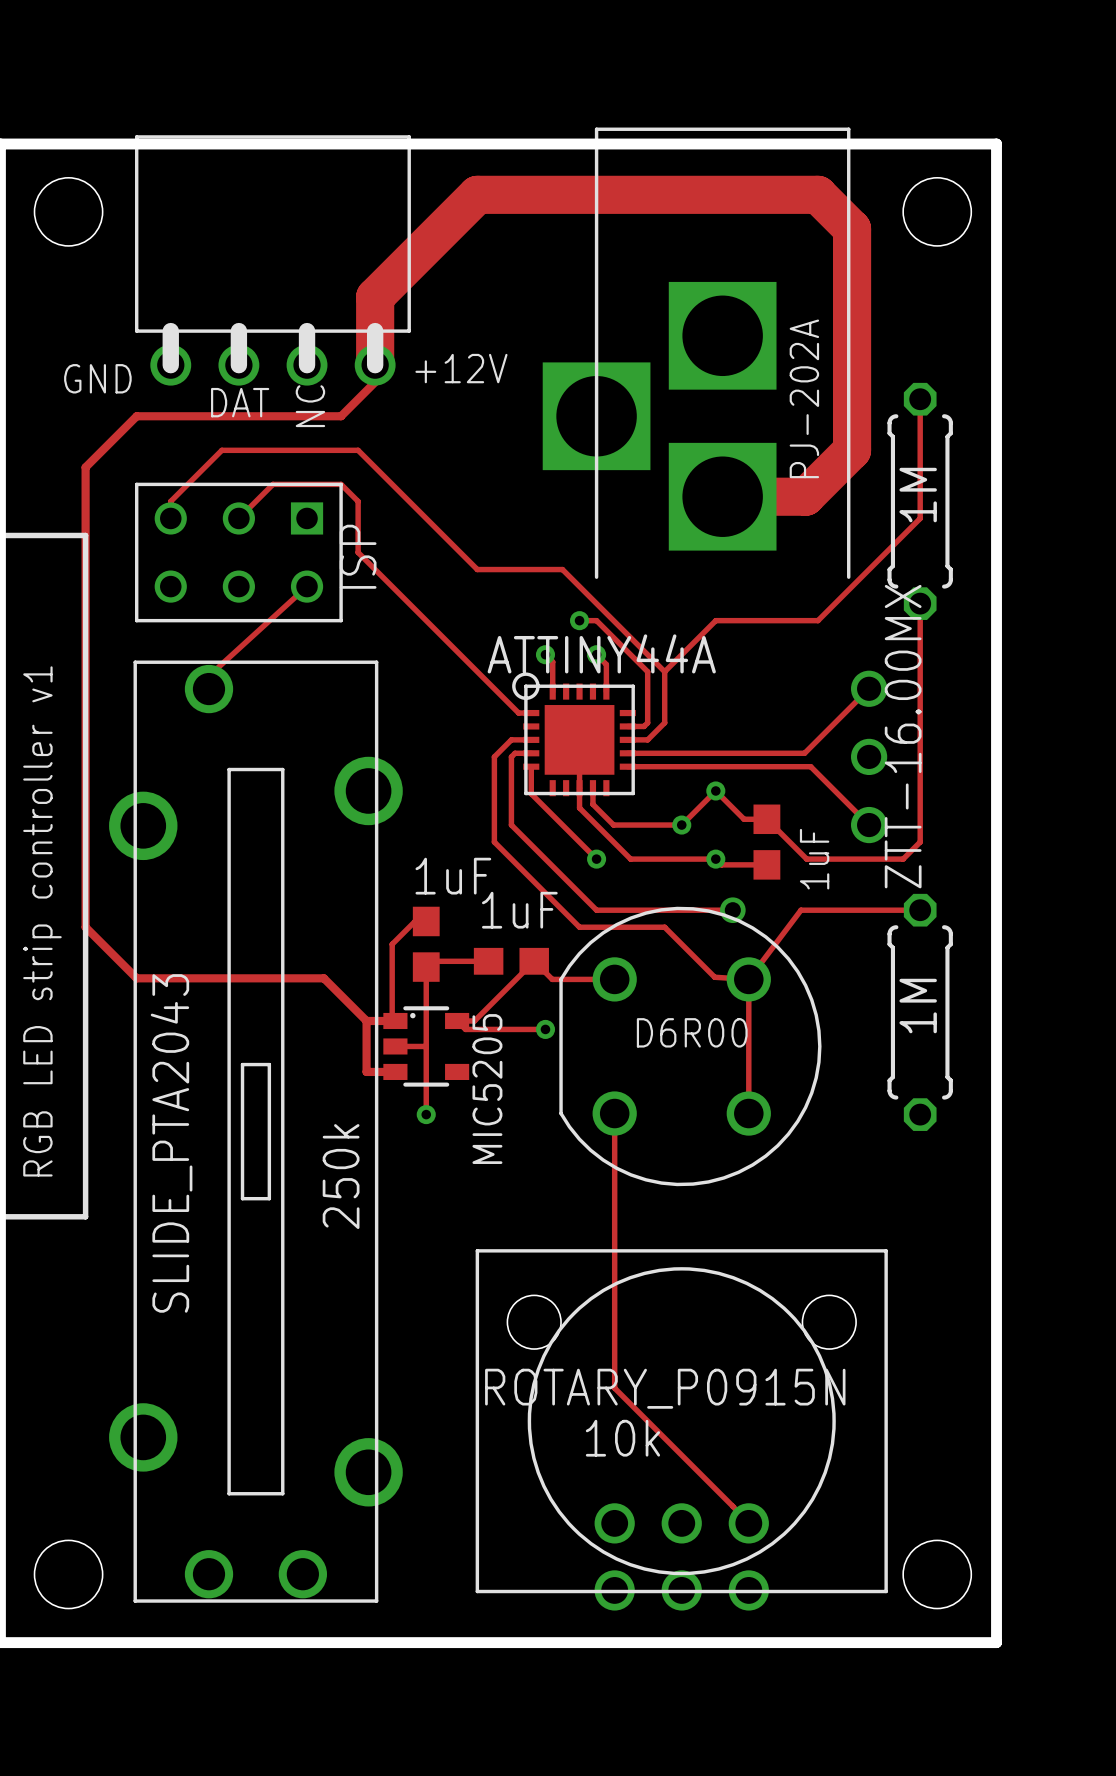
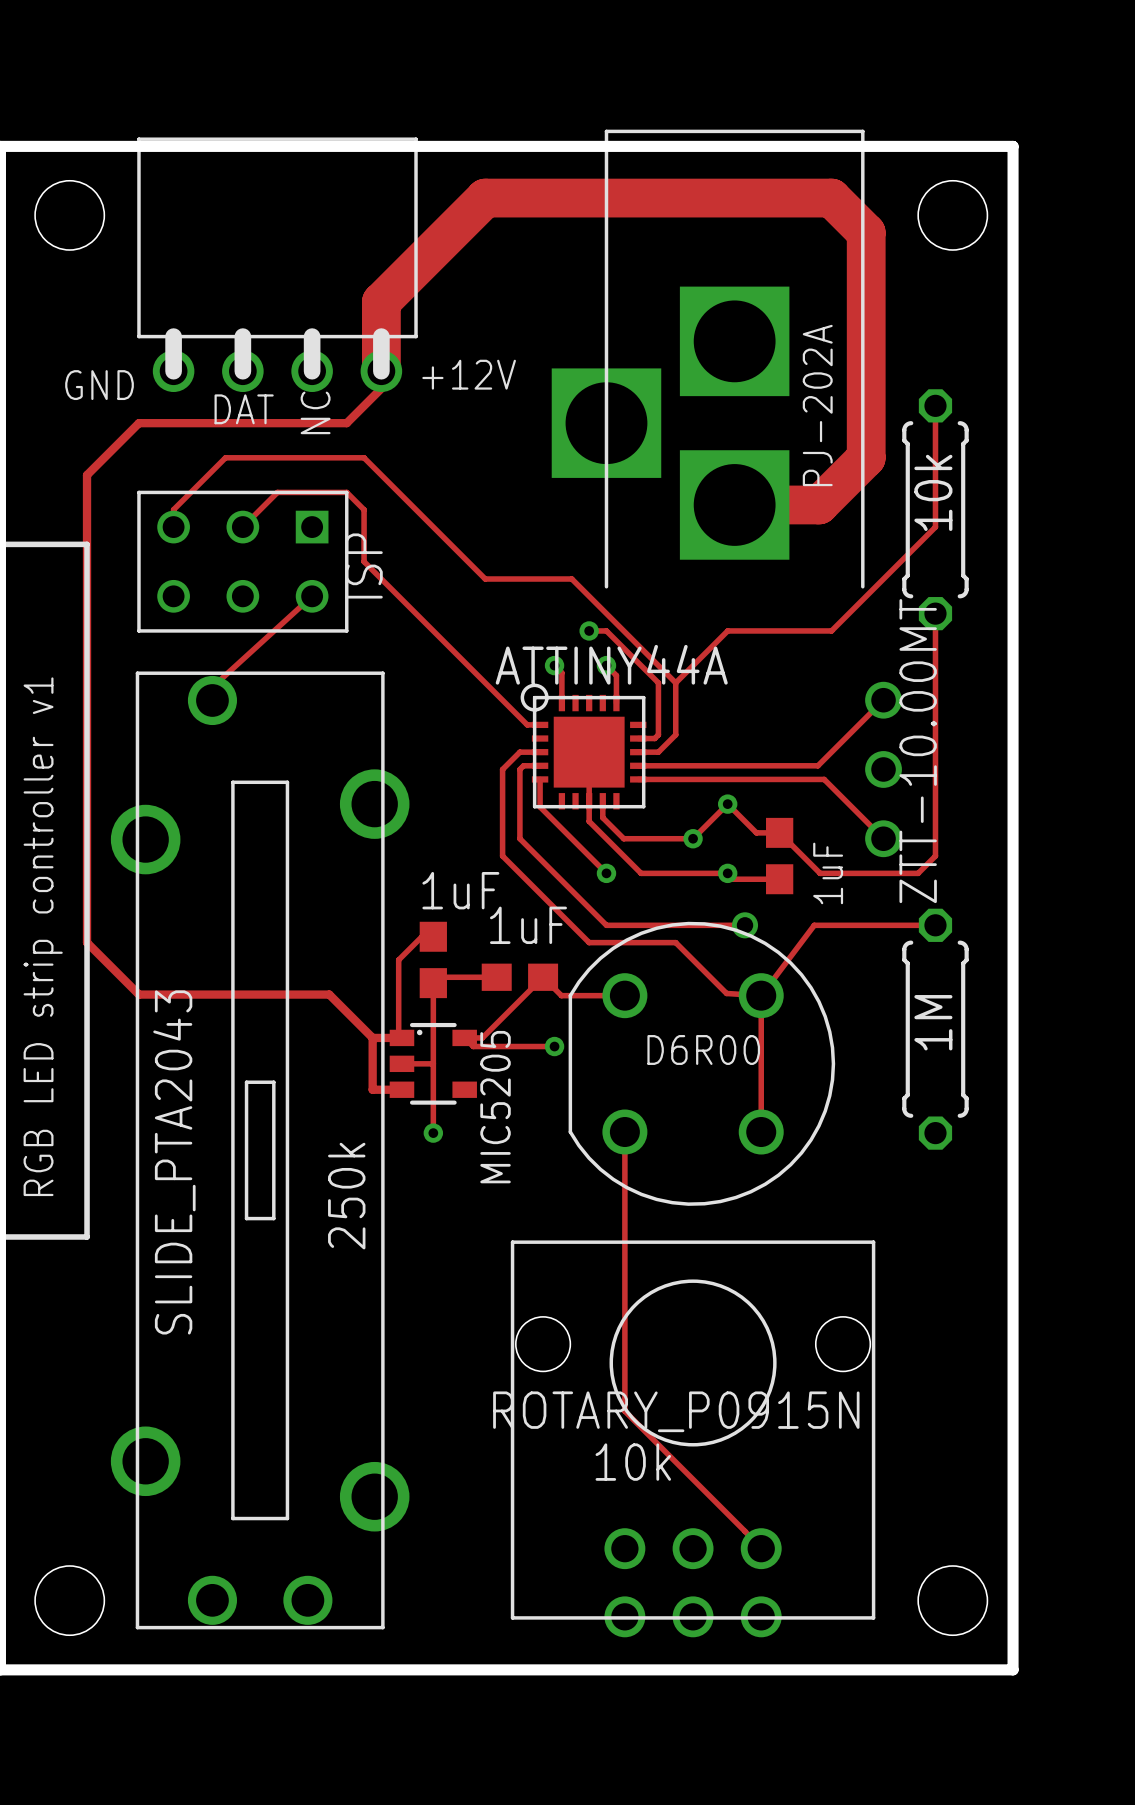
part value: 1M (918, 495) -> 10k (933, 492)
part value: ZTT-16.00MX (903, 736) -> ZTT-10.00MT (918, 751)
ROTARY_P0915N footprint: [475, 1249, 888, 1611] -> [510, 1240, 876, 1638]

